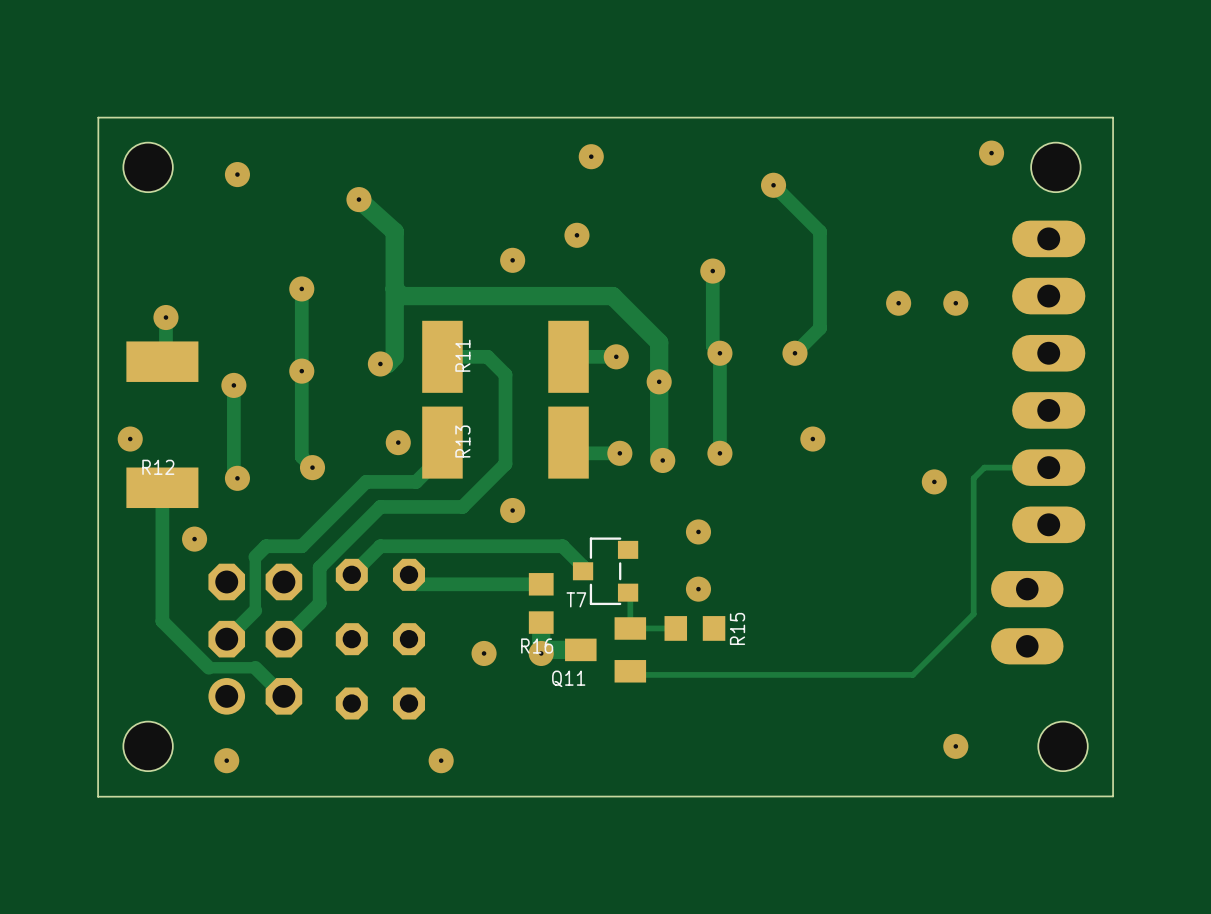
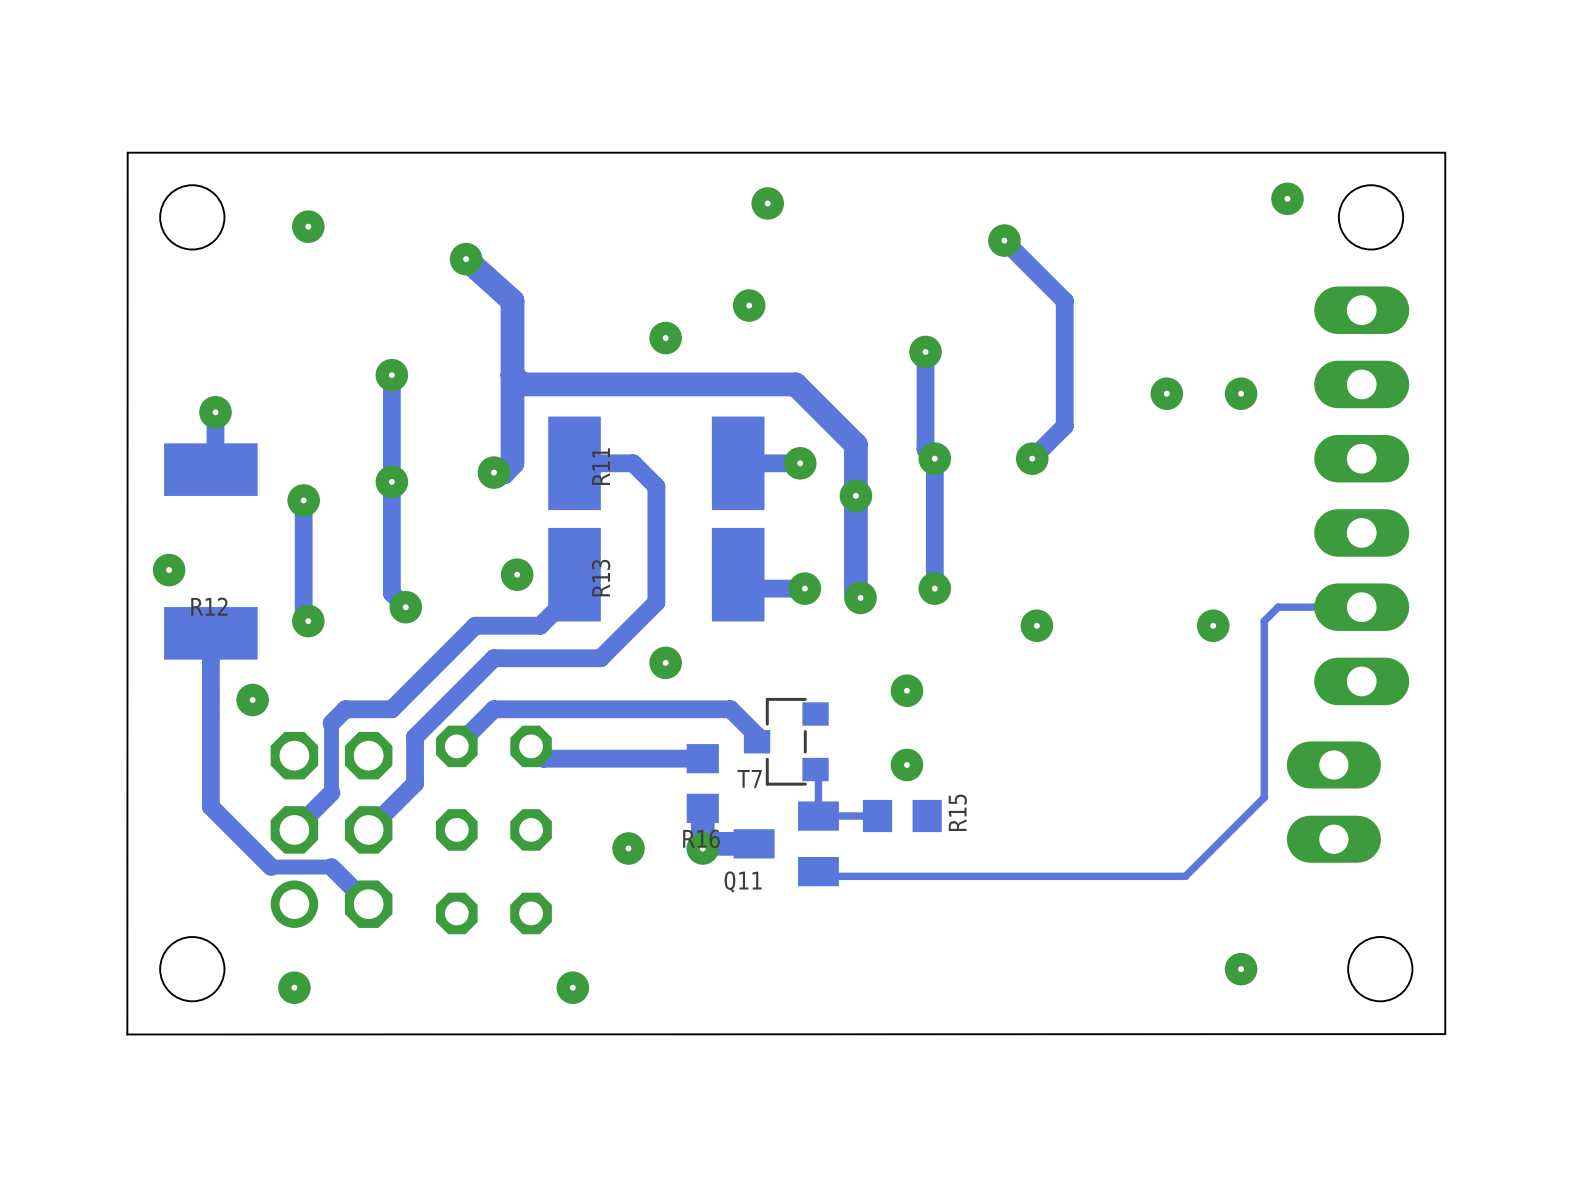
via position: (812, 439) -> (1036, 625)

